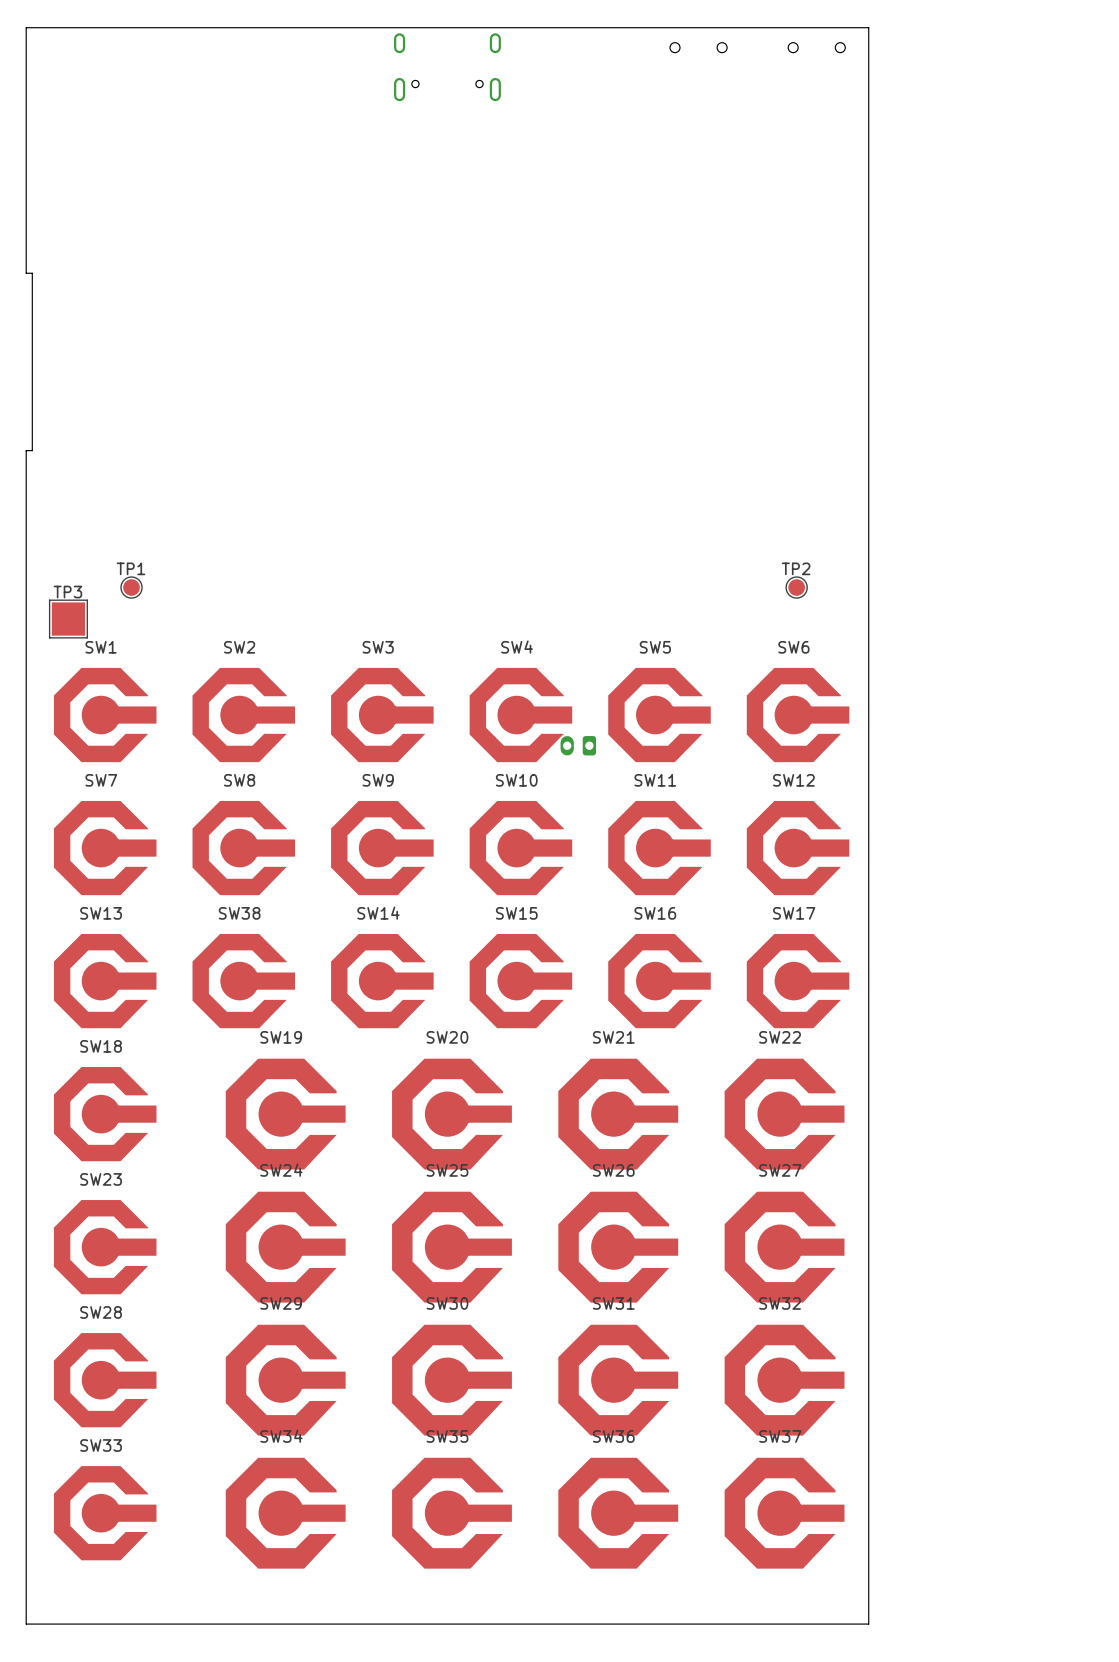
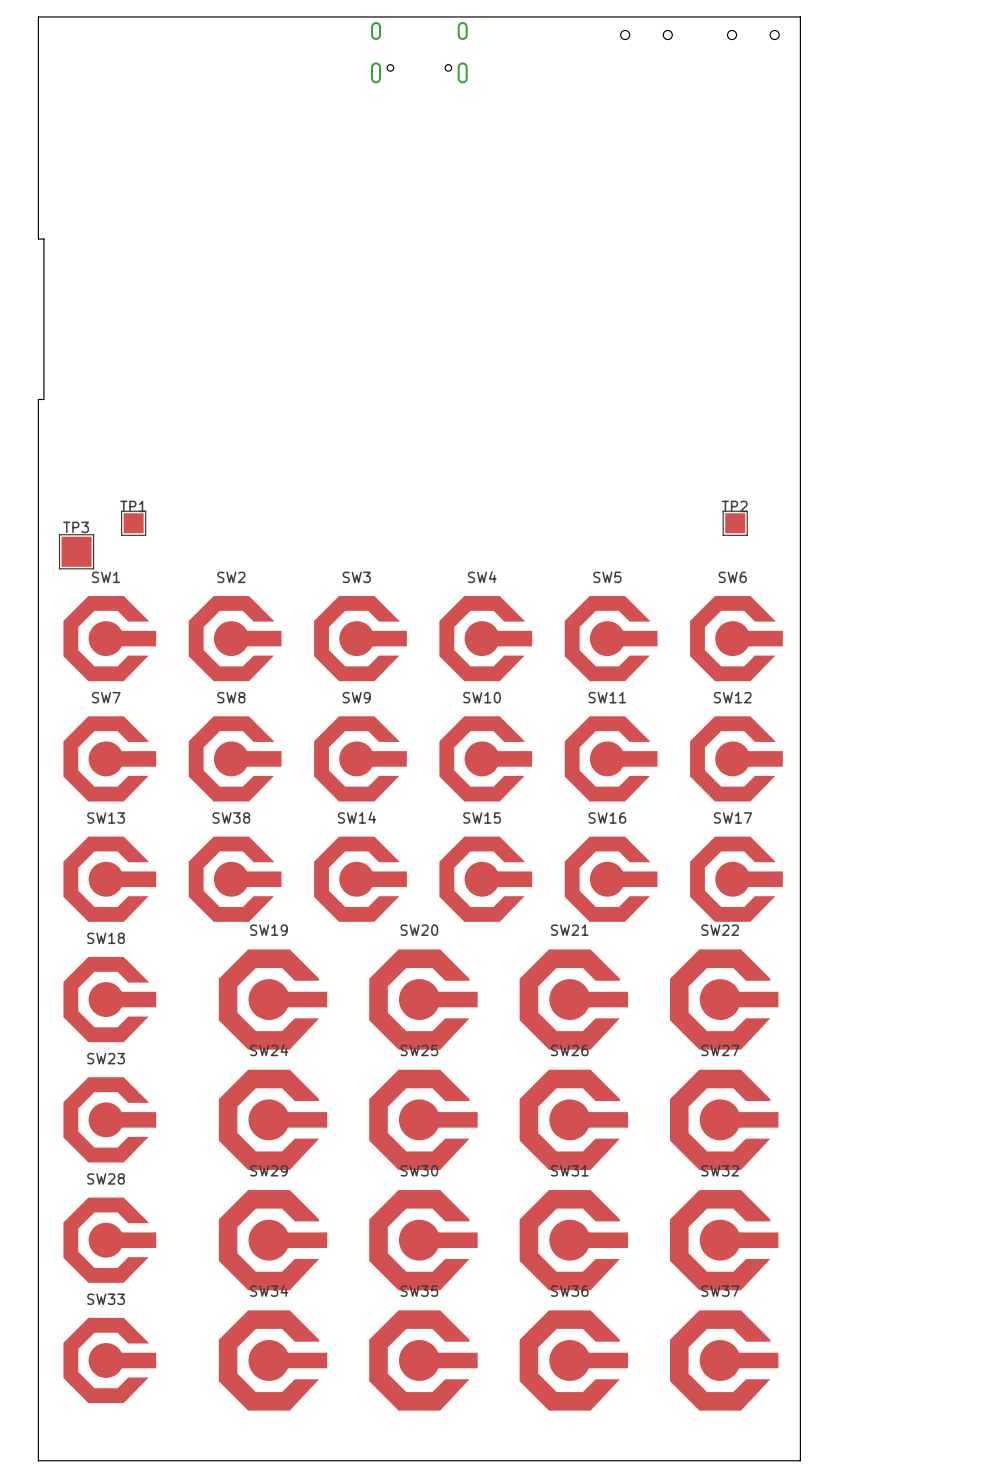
TP1 footprint: [120, 576, 143, 599] -> [120, 510, 147, 536]
TP2 footprint: [785, 576, 808, 599] -> [722, 510, 748, 536]
part: (578, 745) -> none

